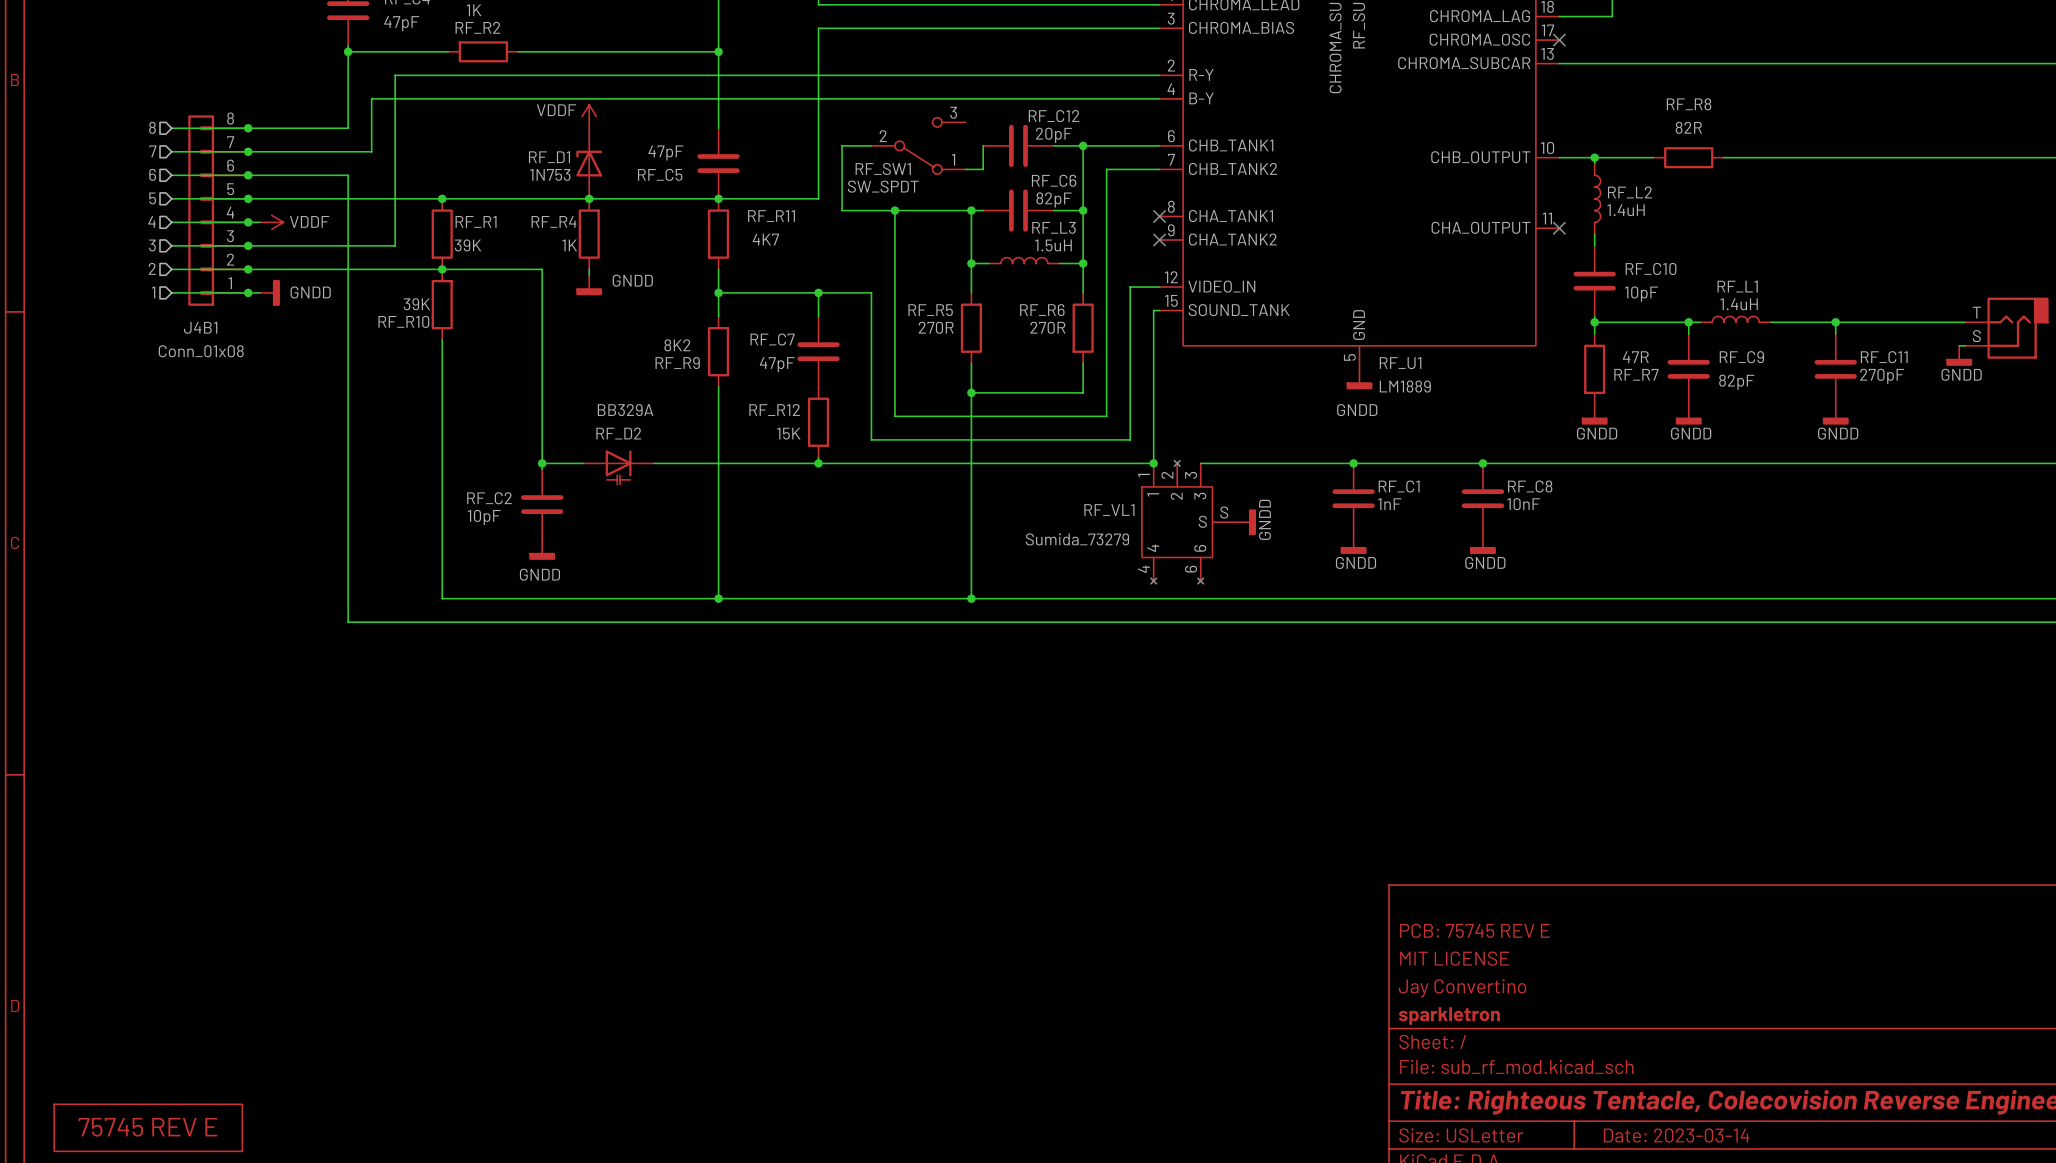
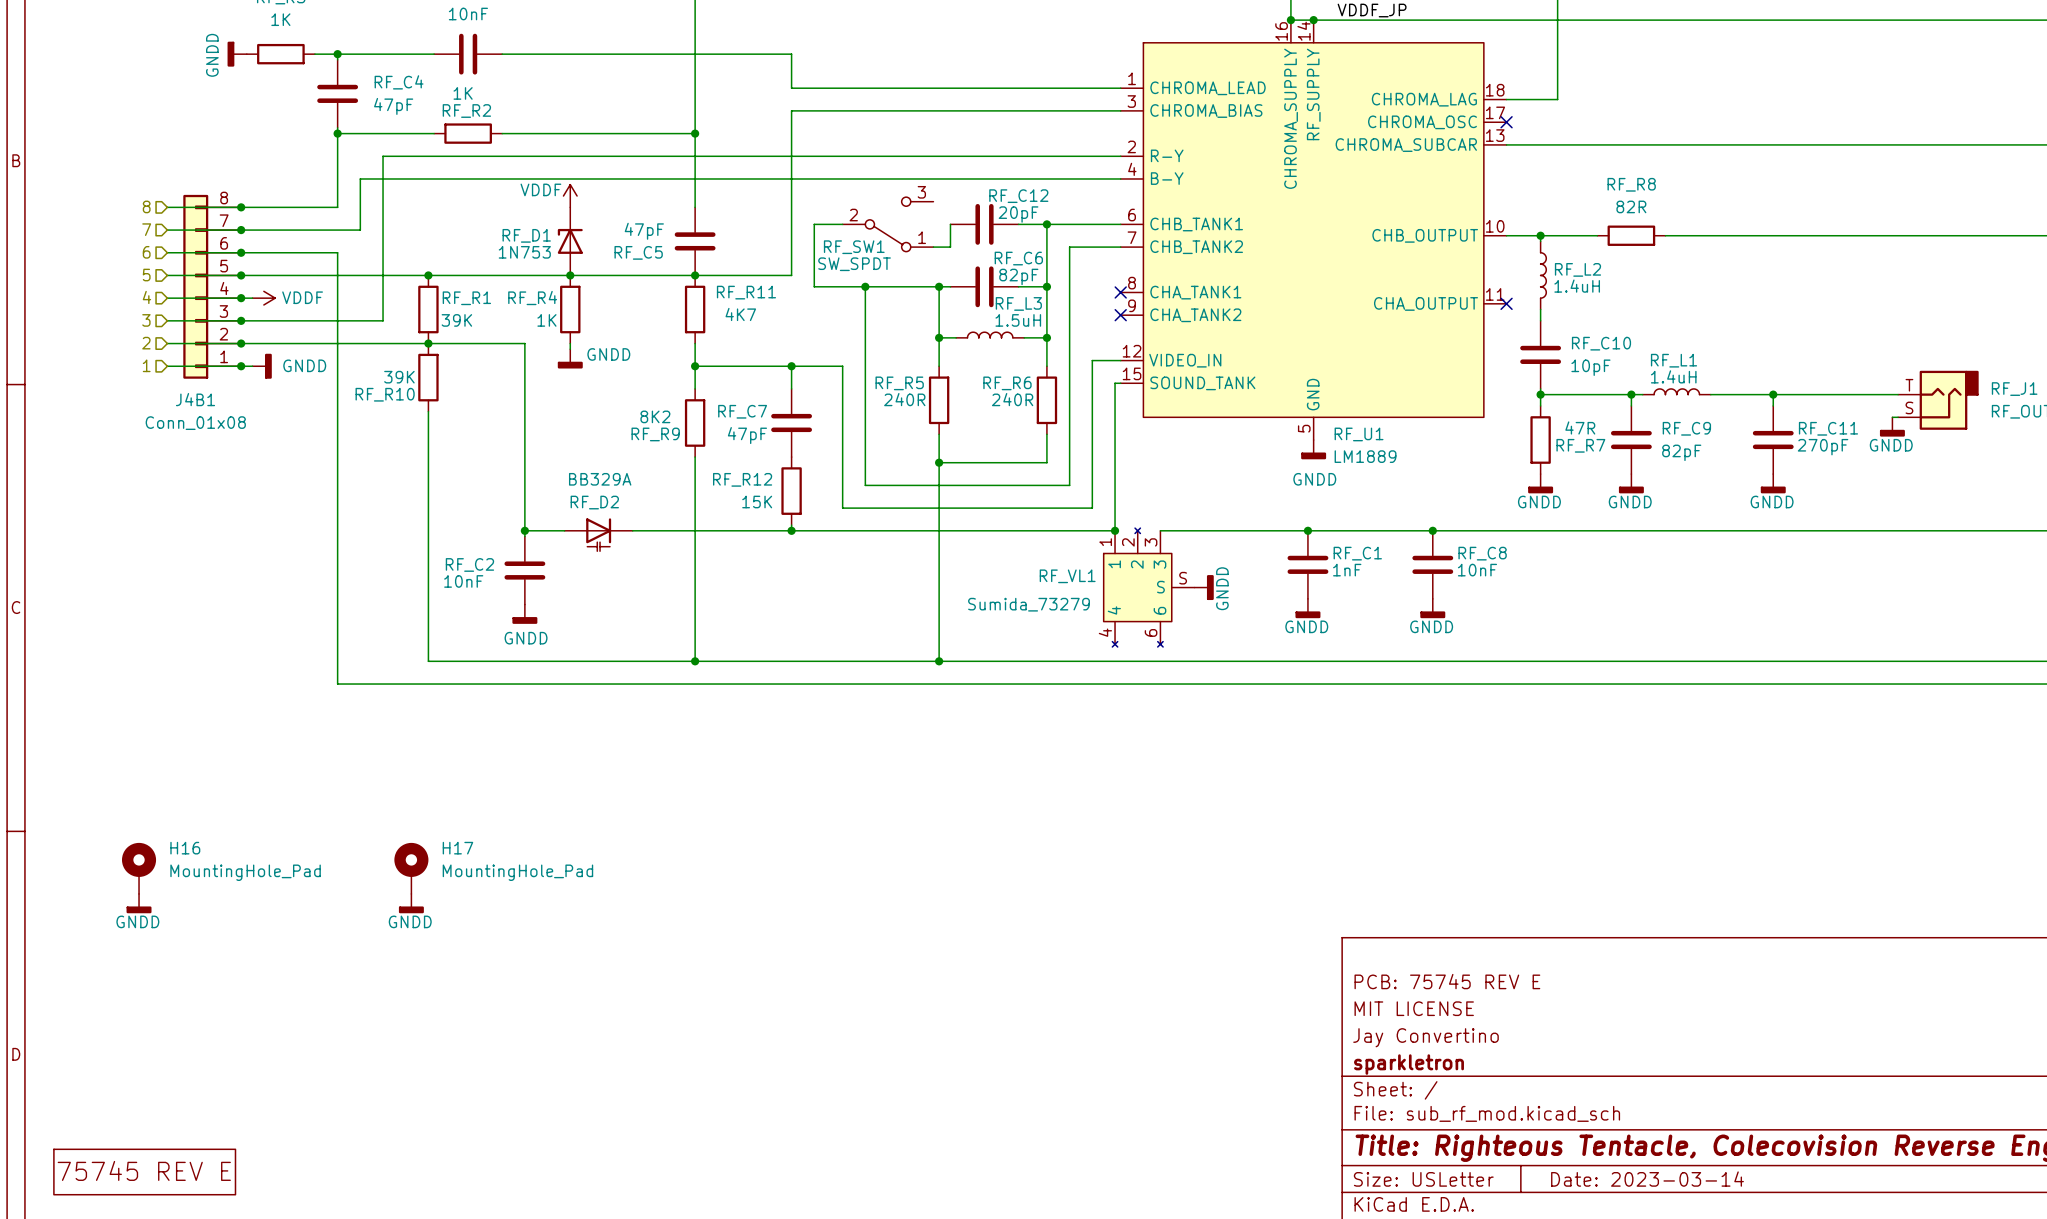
RF_R5 value: 270R (936, 327) -> 240R (904, 399)
RF_R6 value: 270R (1047, 327) -> 240R (1012, 399)
RF_C2 value: 10pF (484, 517) -> 10nF (463, 581)
H16: none -> MountingHole_Pad (139, 868)
H17: none -> MountingHole_Pad (411, 868)
power symbol: none -> GNDD (139, 903)
power symbol: none -> GNDD (411, 903)

